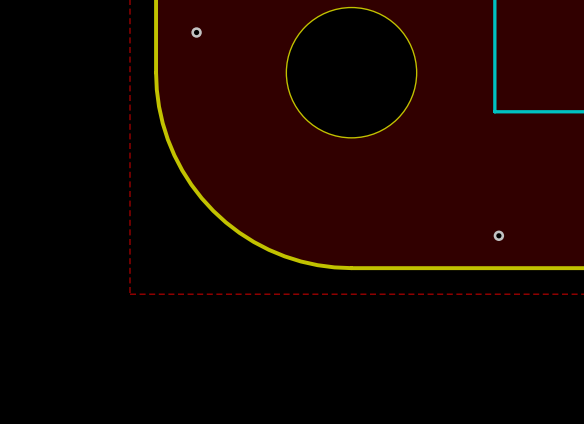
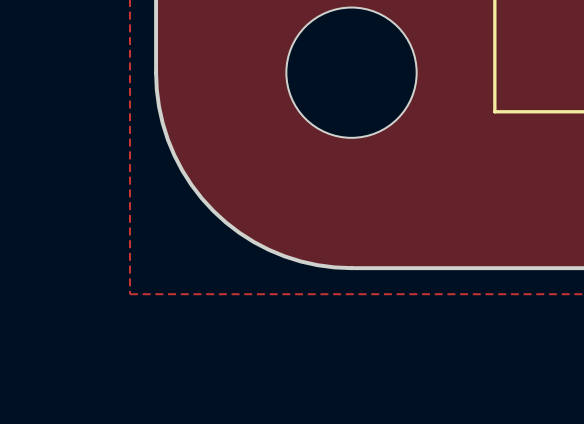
via: (196, 32) -> none
via: (498, 235) -> none

